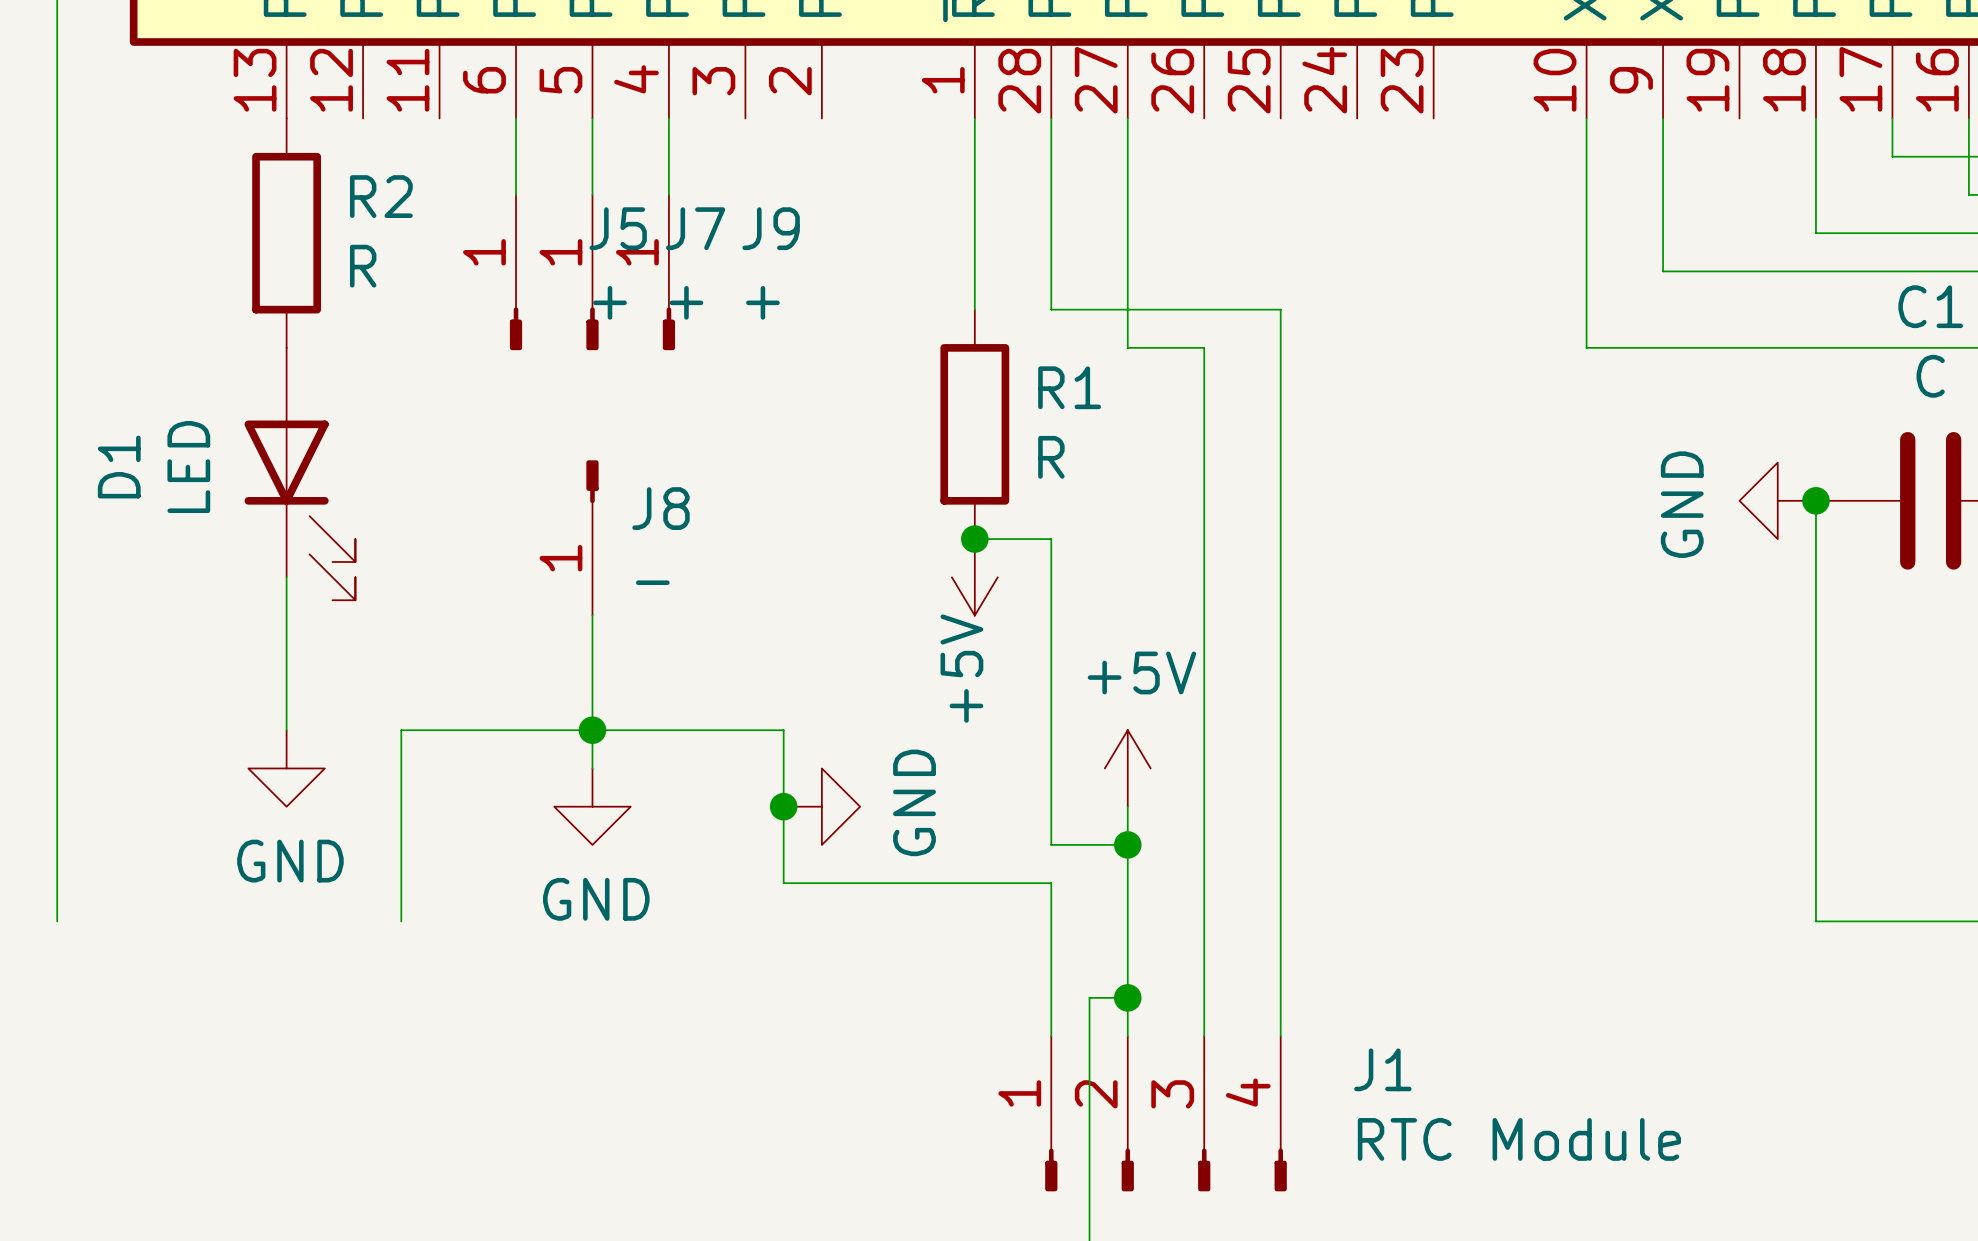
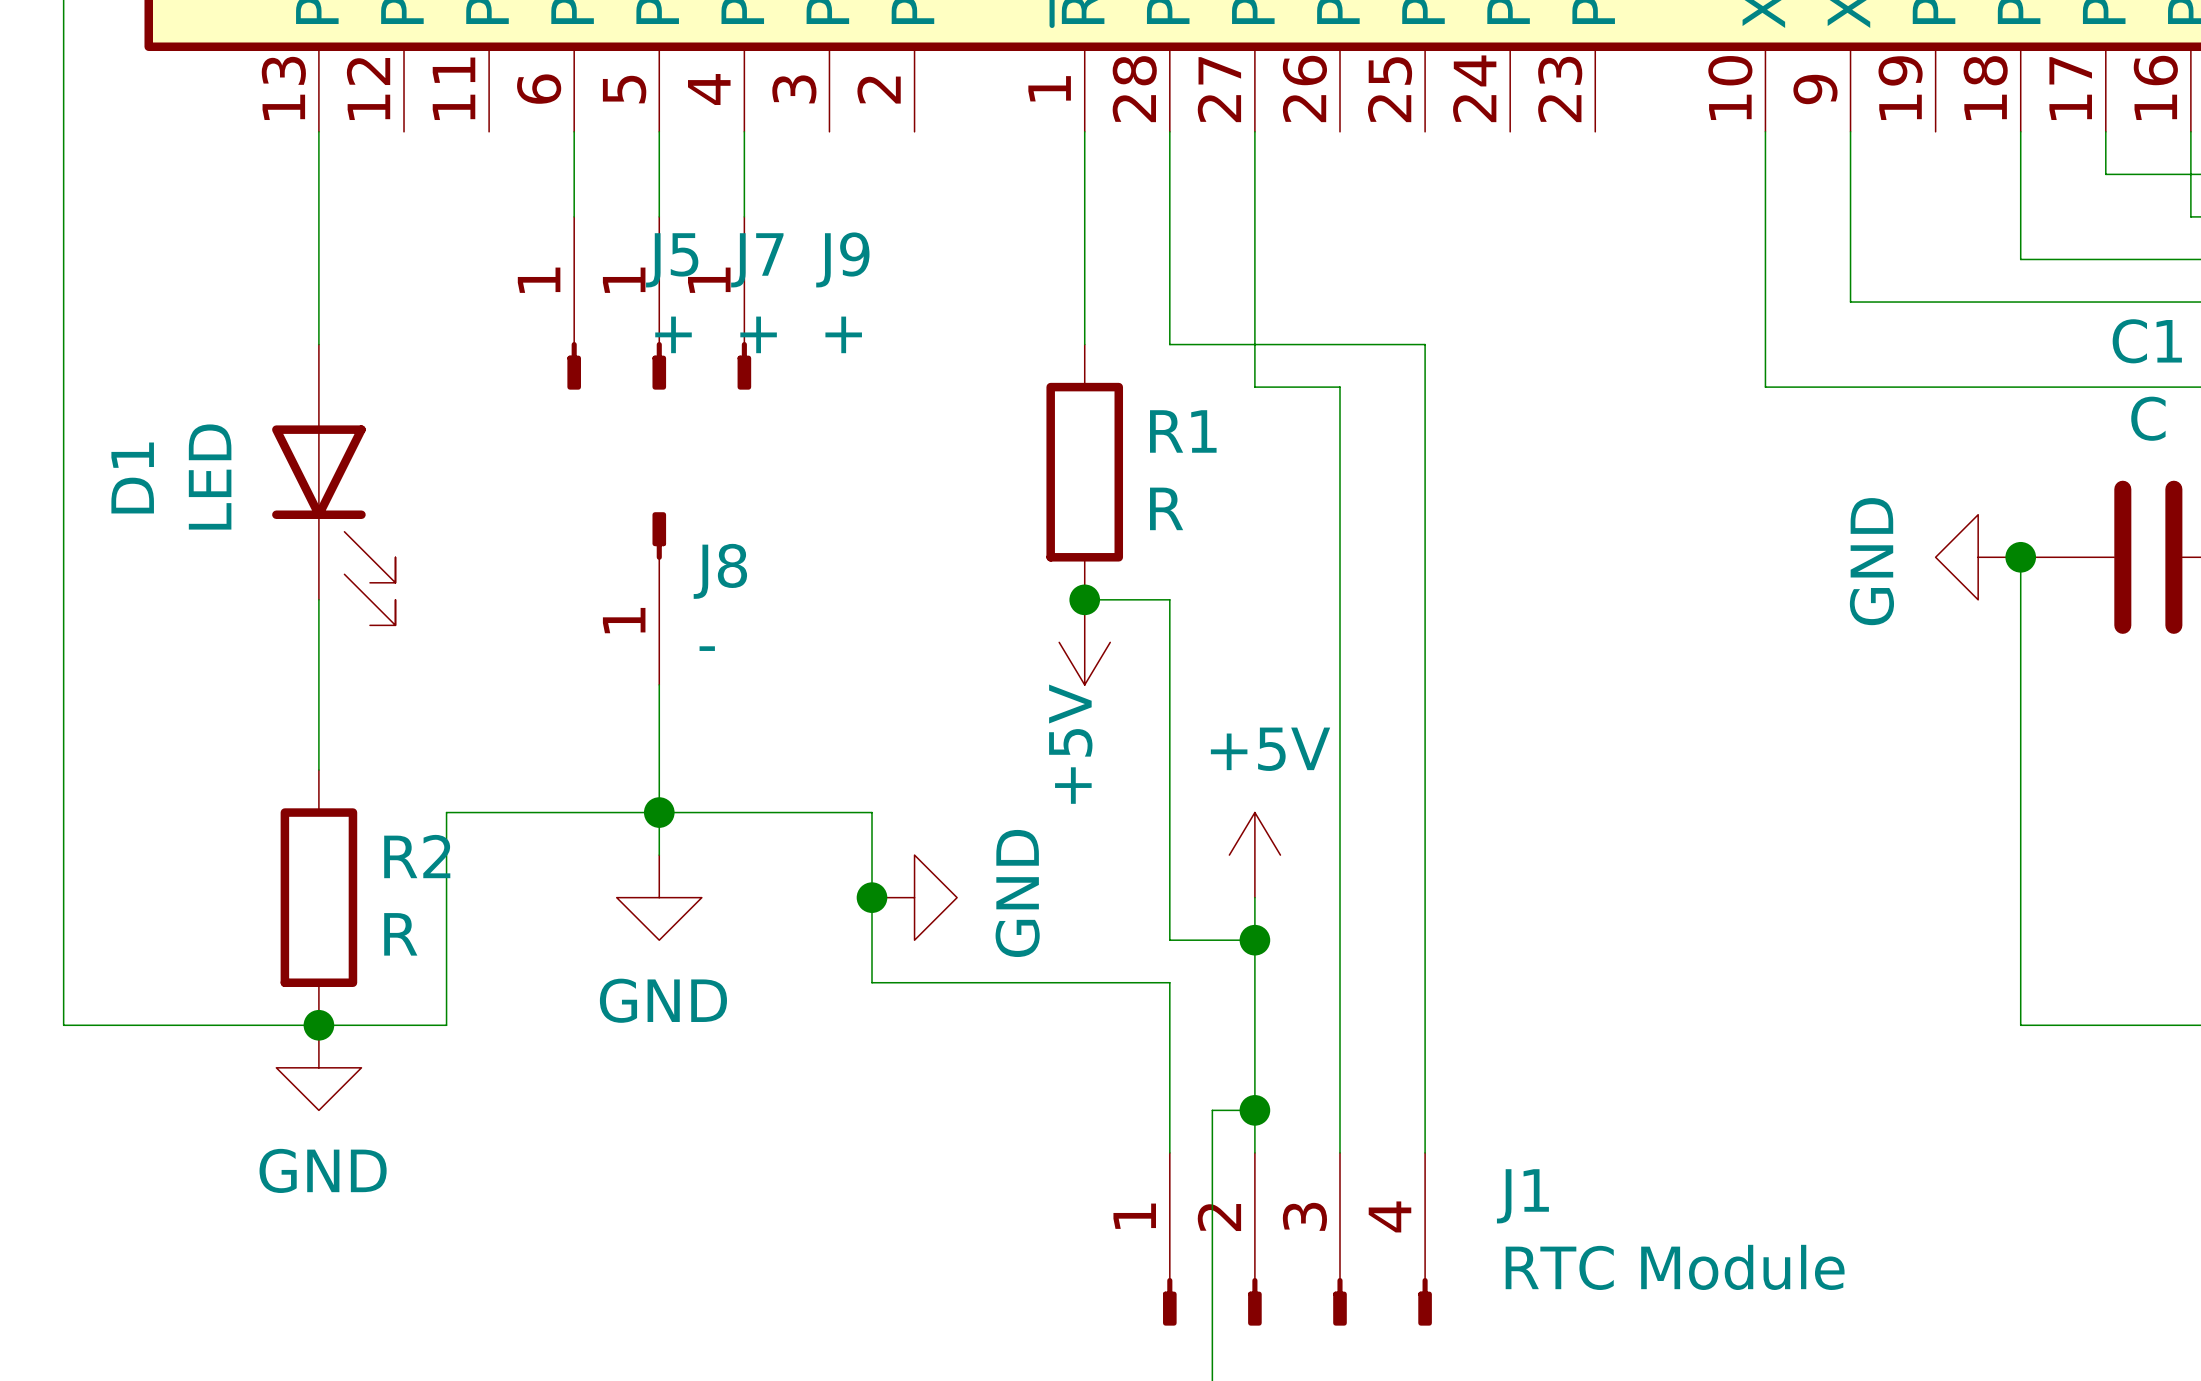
wire: none -> (318, 131) (318, 344)
R2 position: (286, 233) -> (318, 897)
D1 position: (299, 474) -> (333, 484)
power symbol position: GND (286, 768) -> GND (318, 1067)
wire: none -> (63, 1025) (446, 1025)
junction: none -> (318, 1025)

